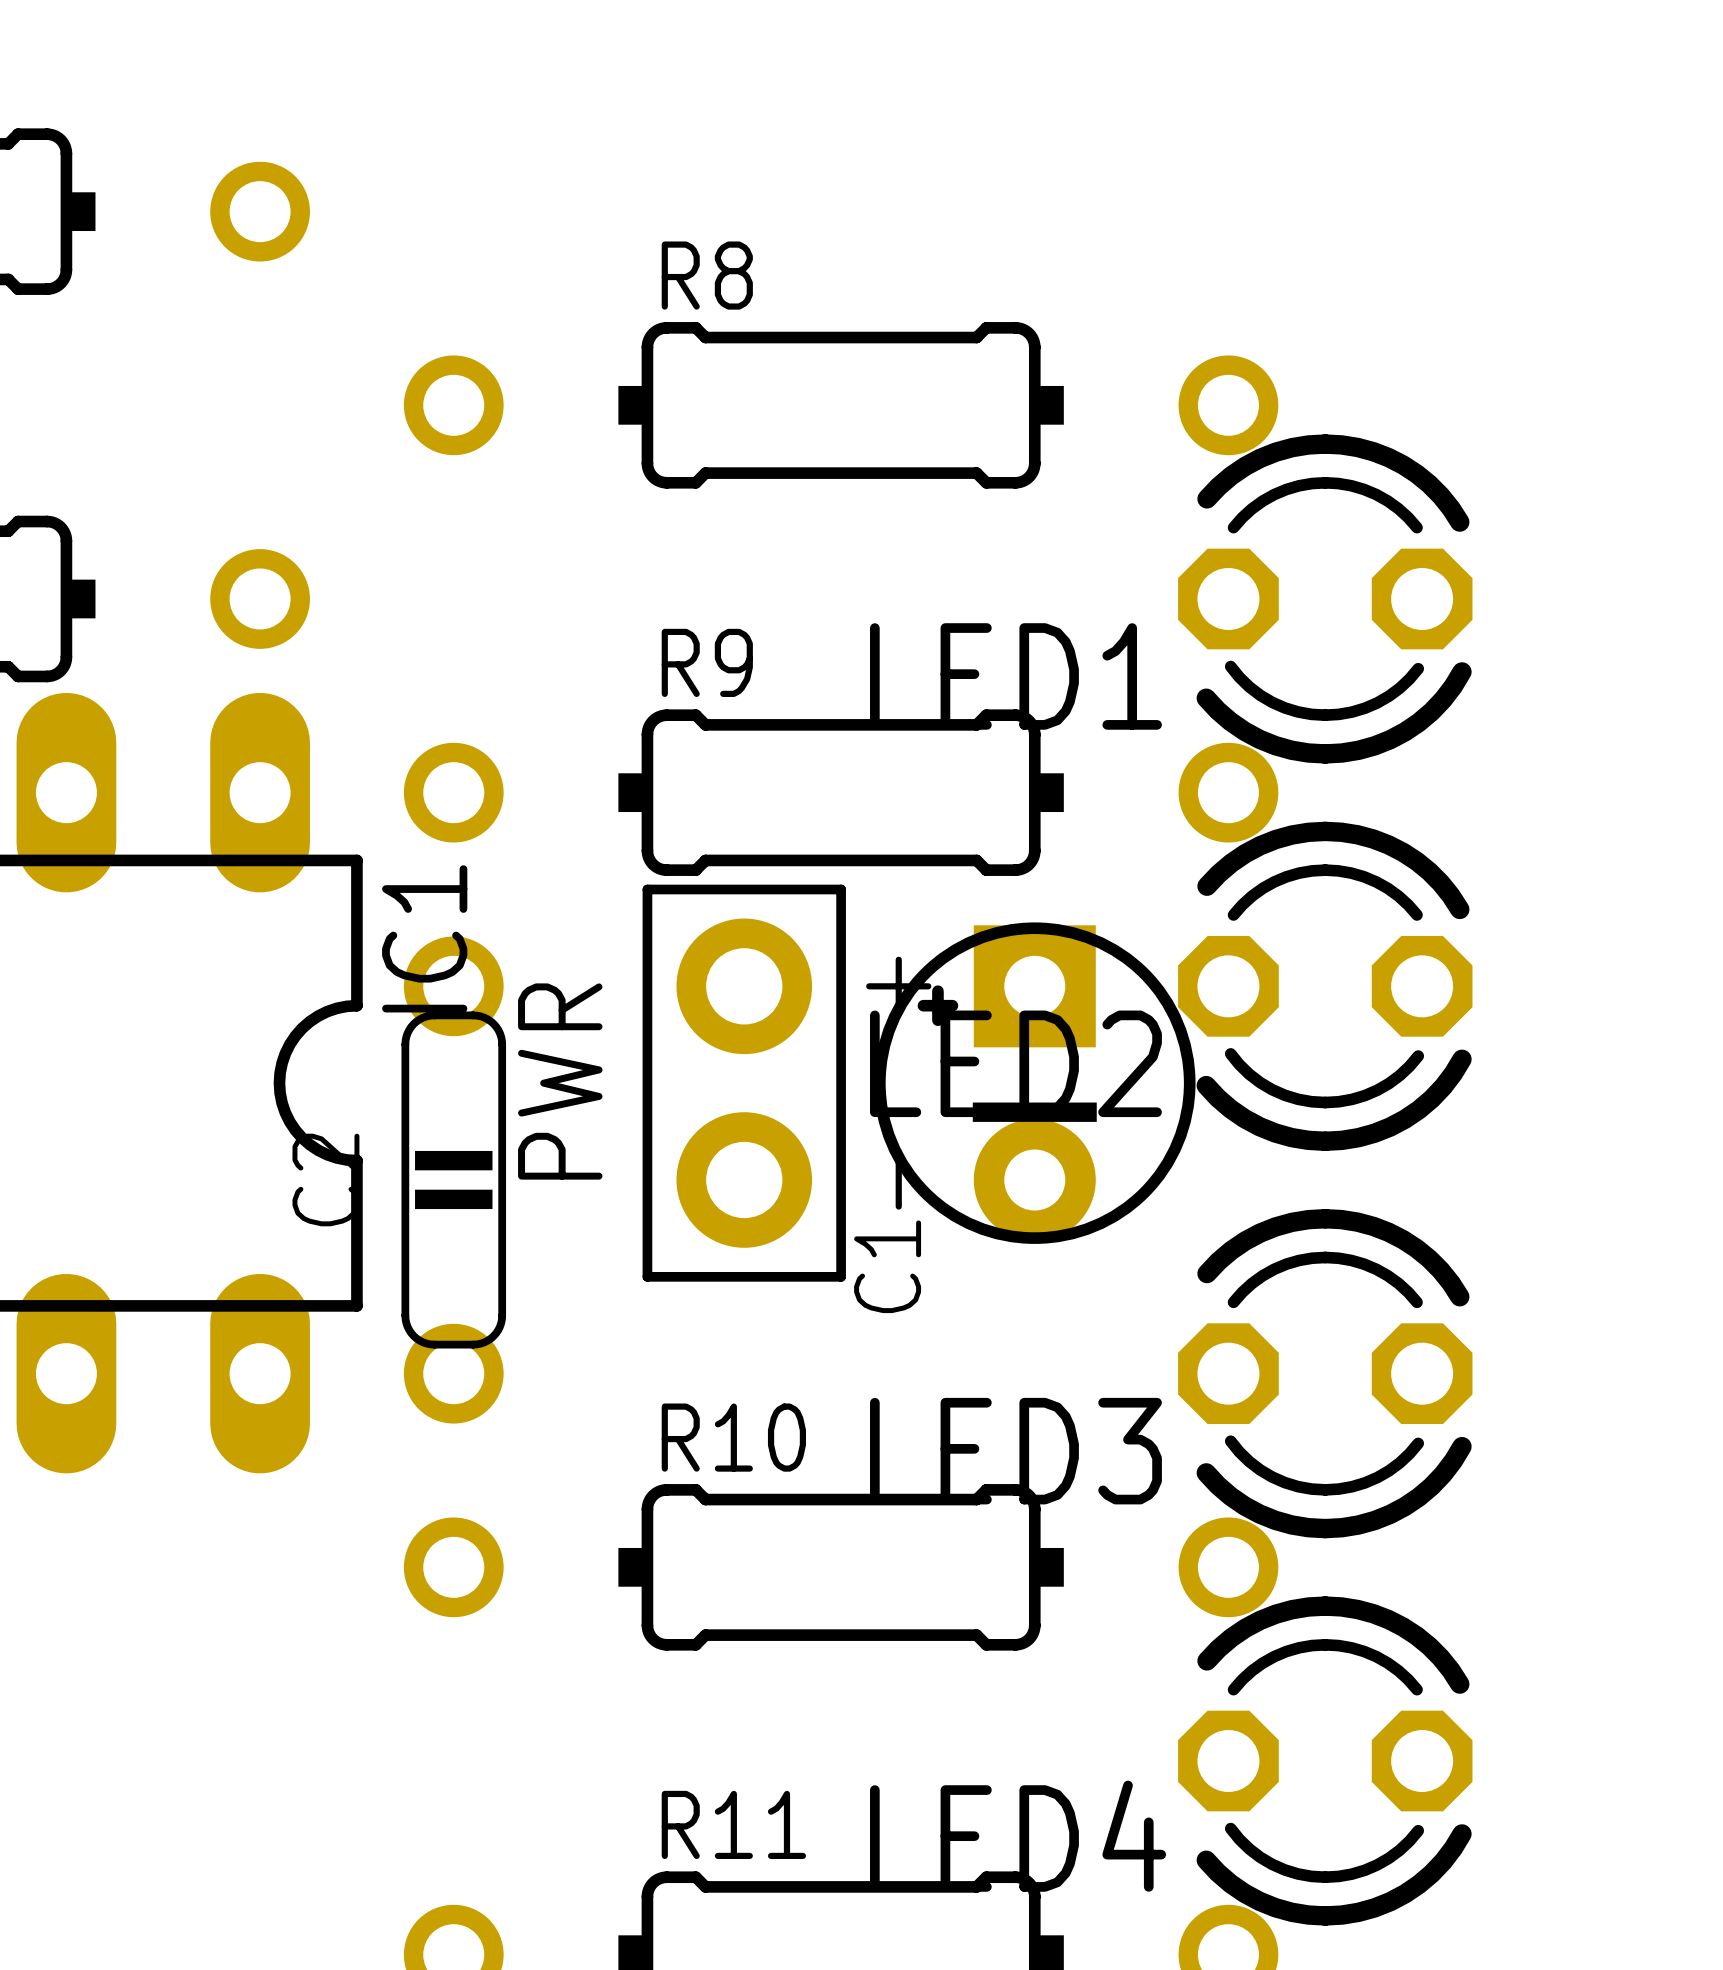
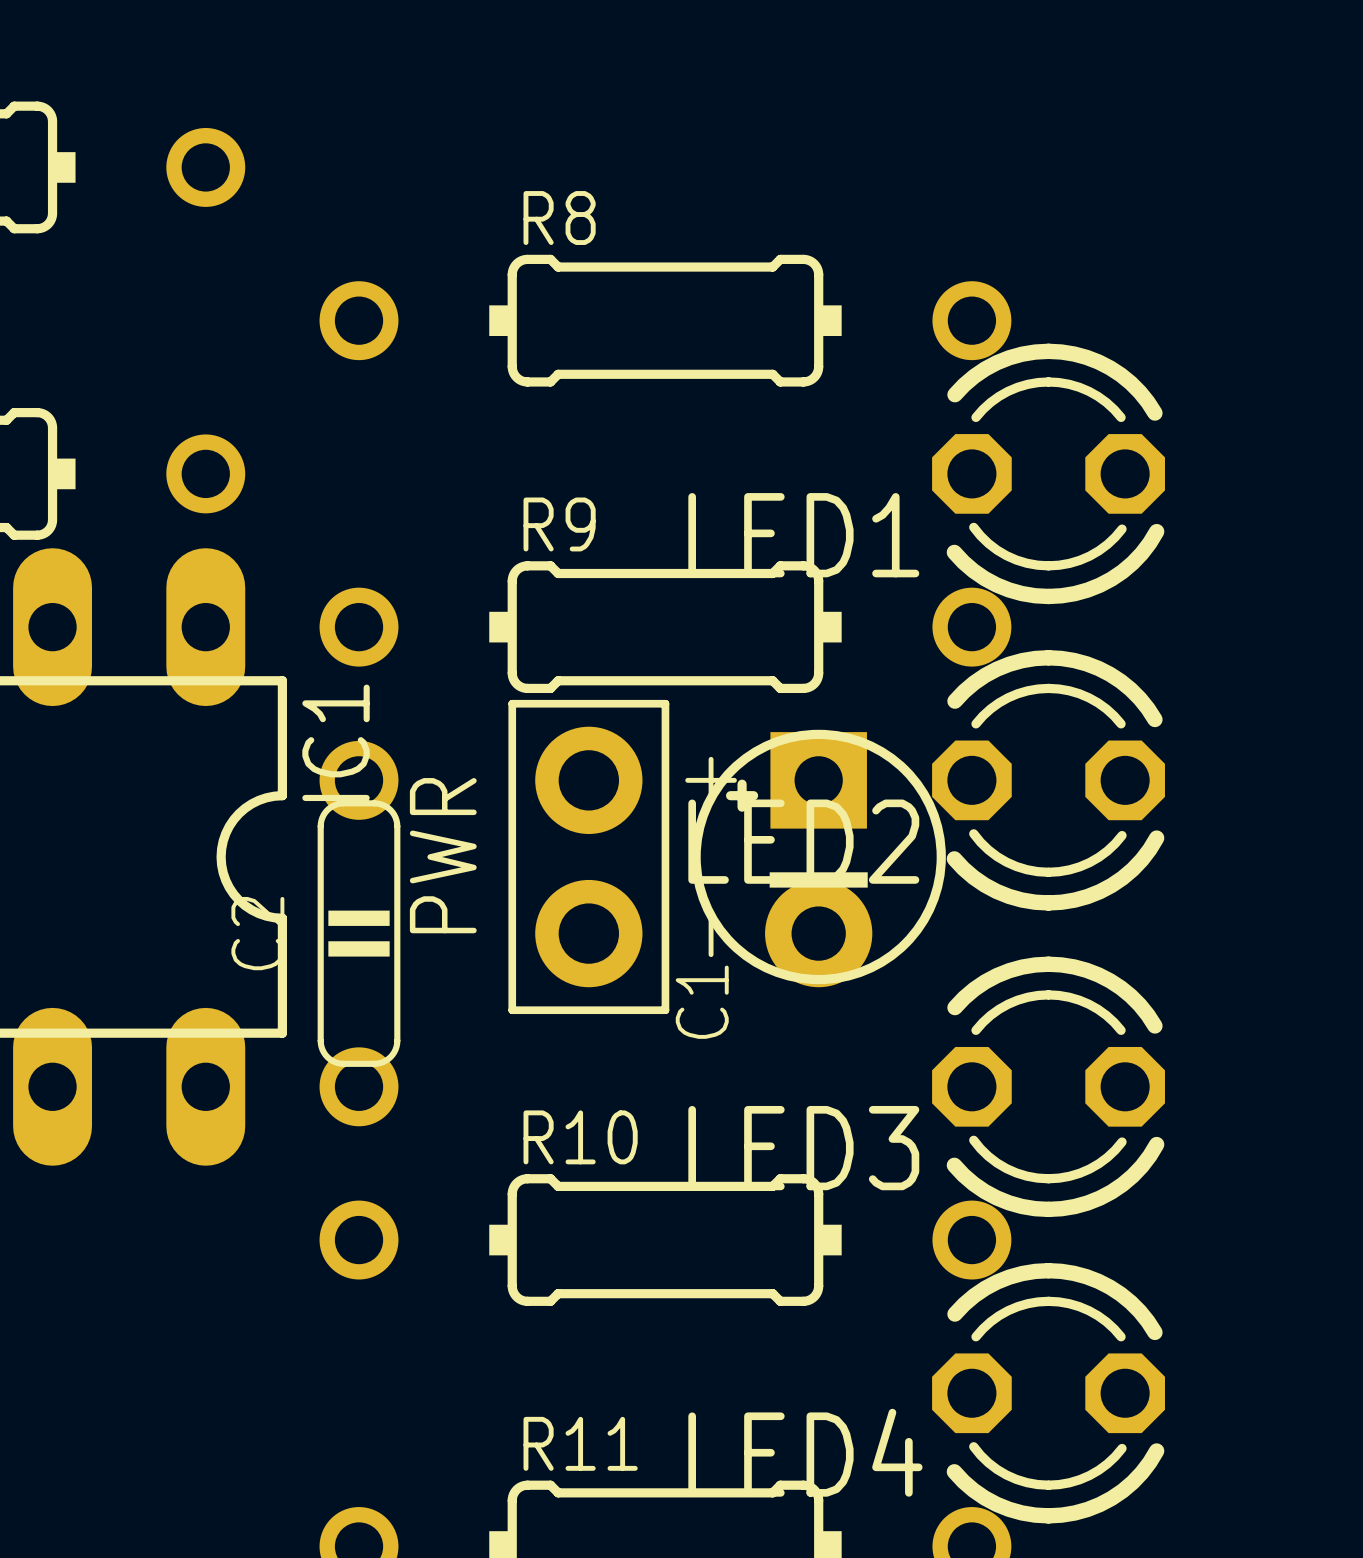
C1 footprint: [874, 922, 1196, 1244] -> [691, 729, 946, 988]

